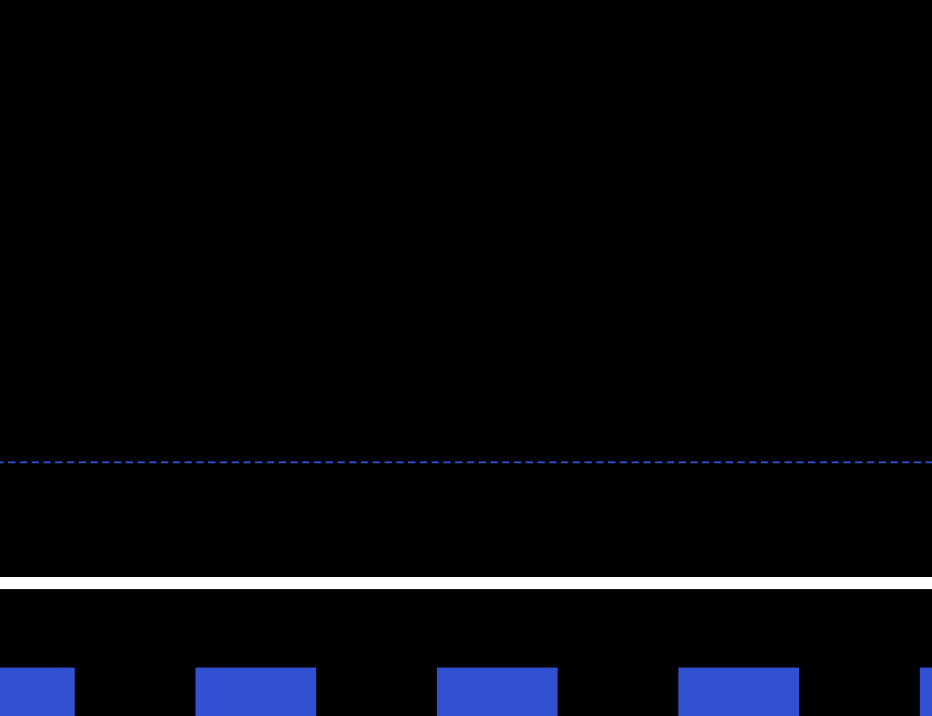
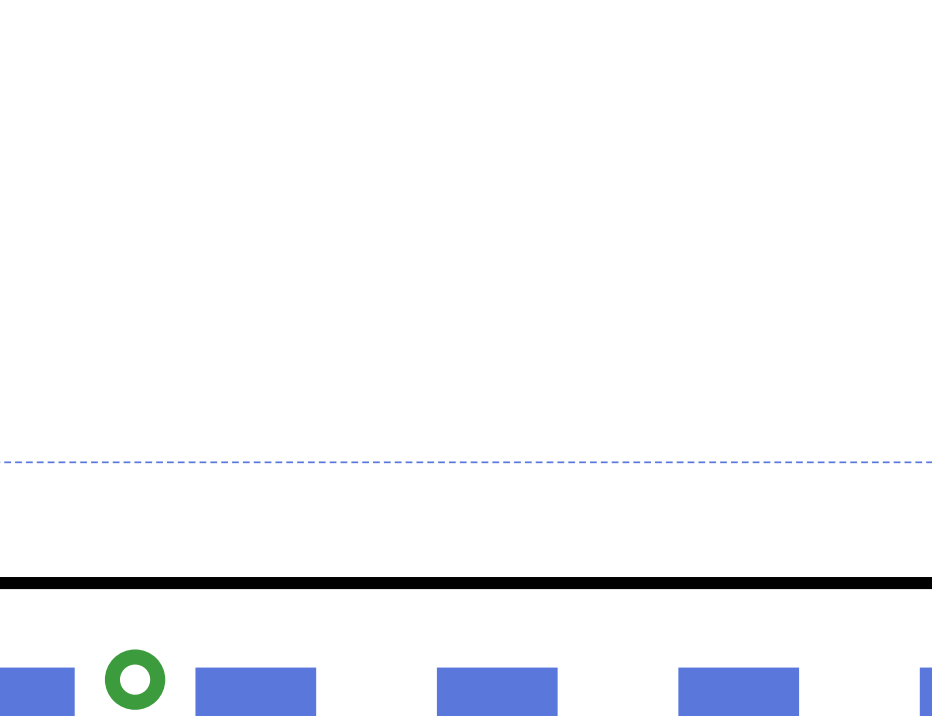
via: none -> (135, 679)

